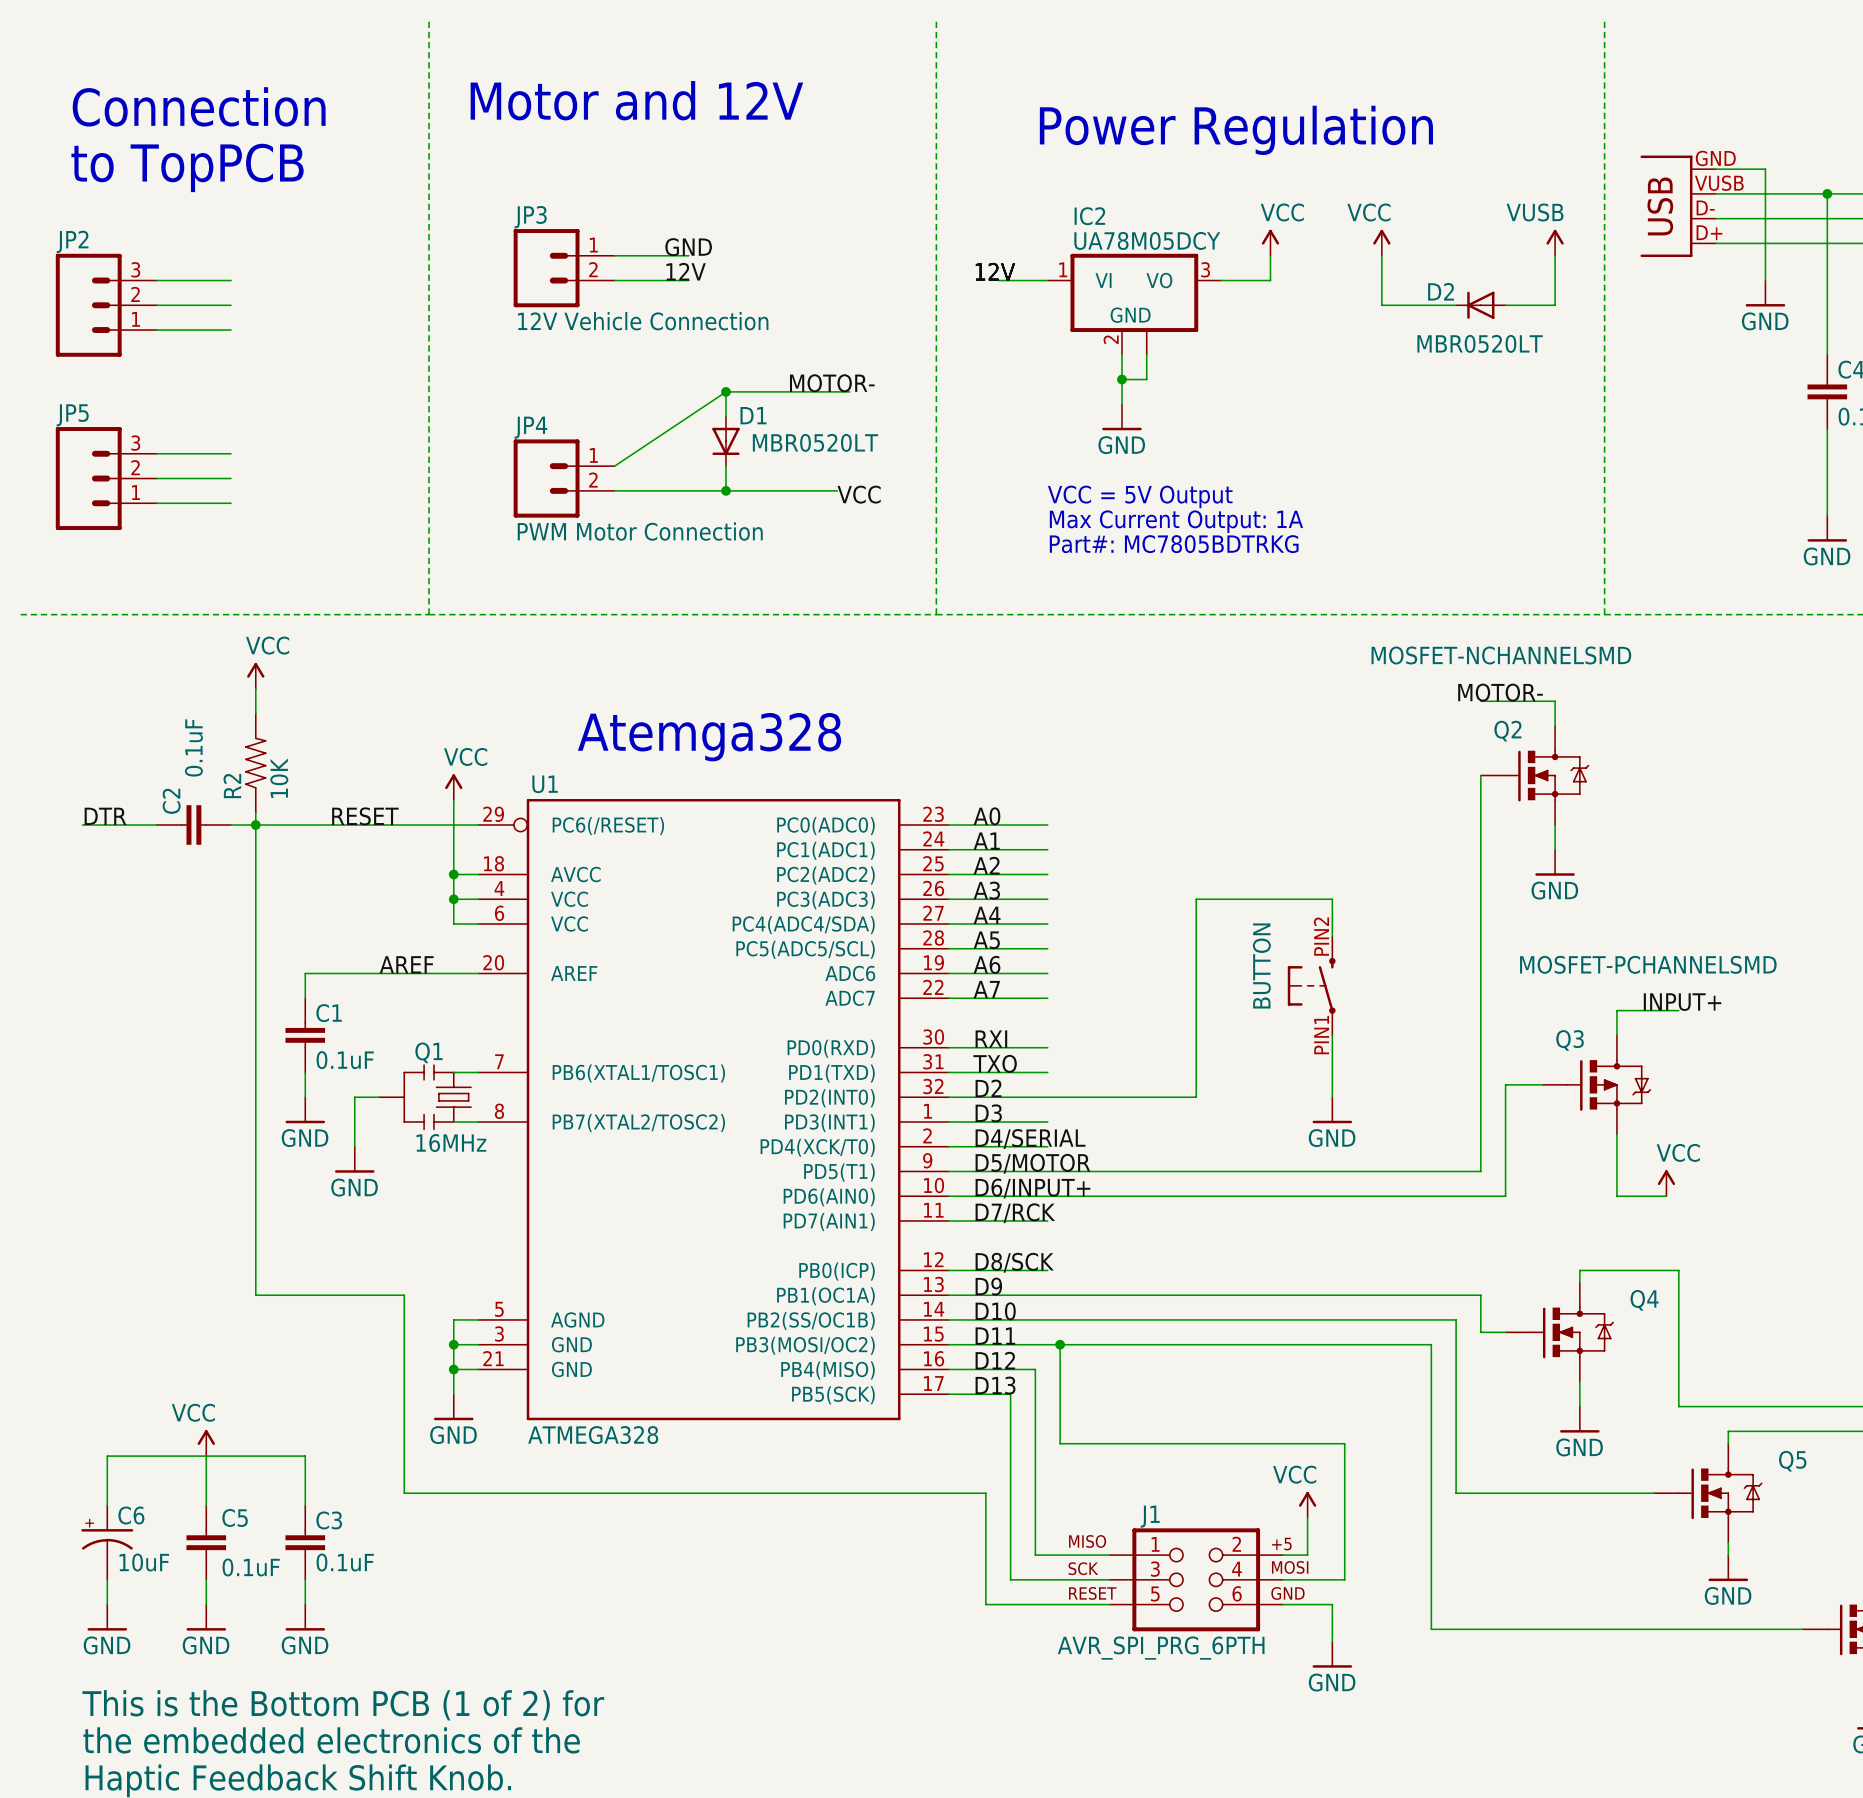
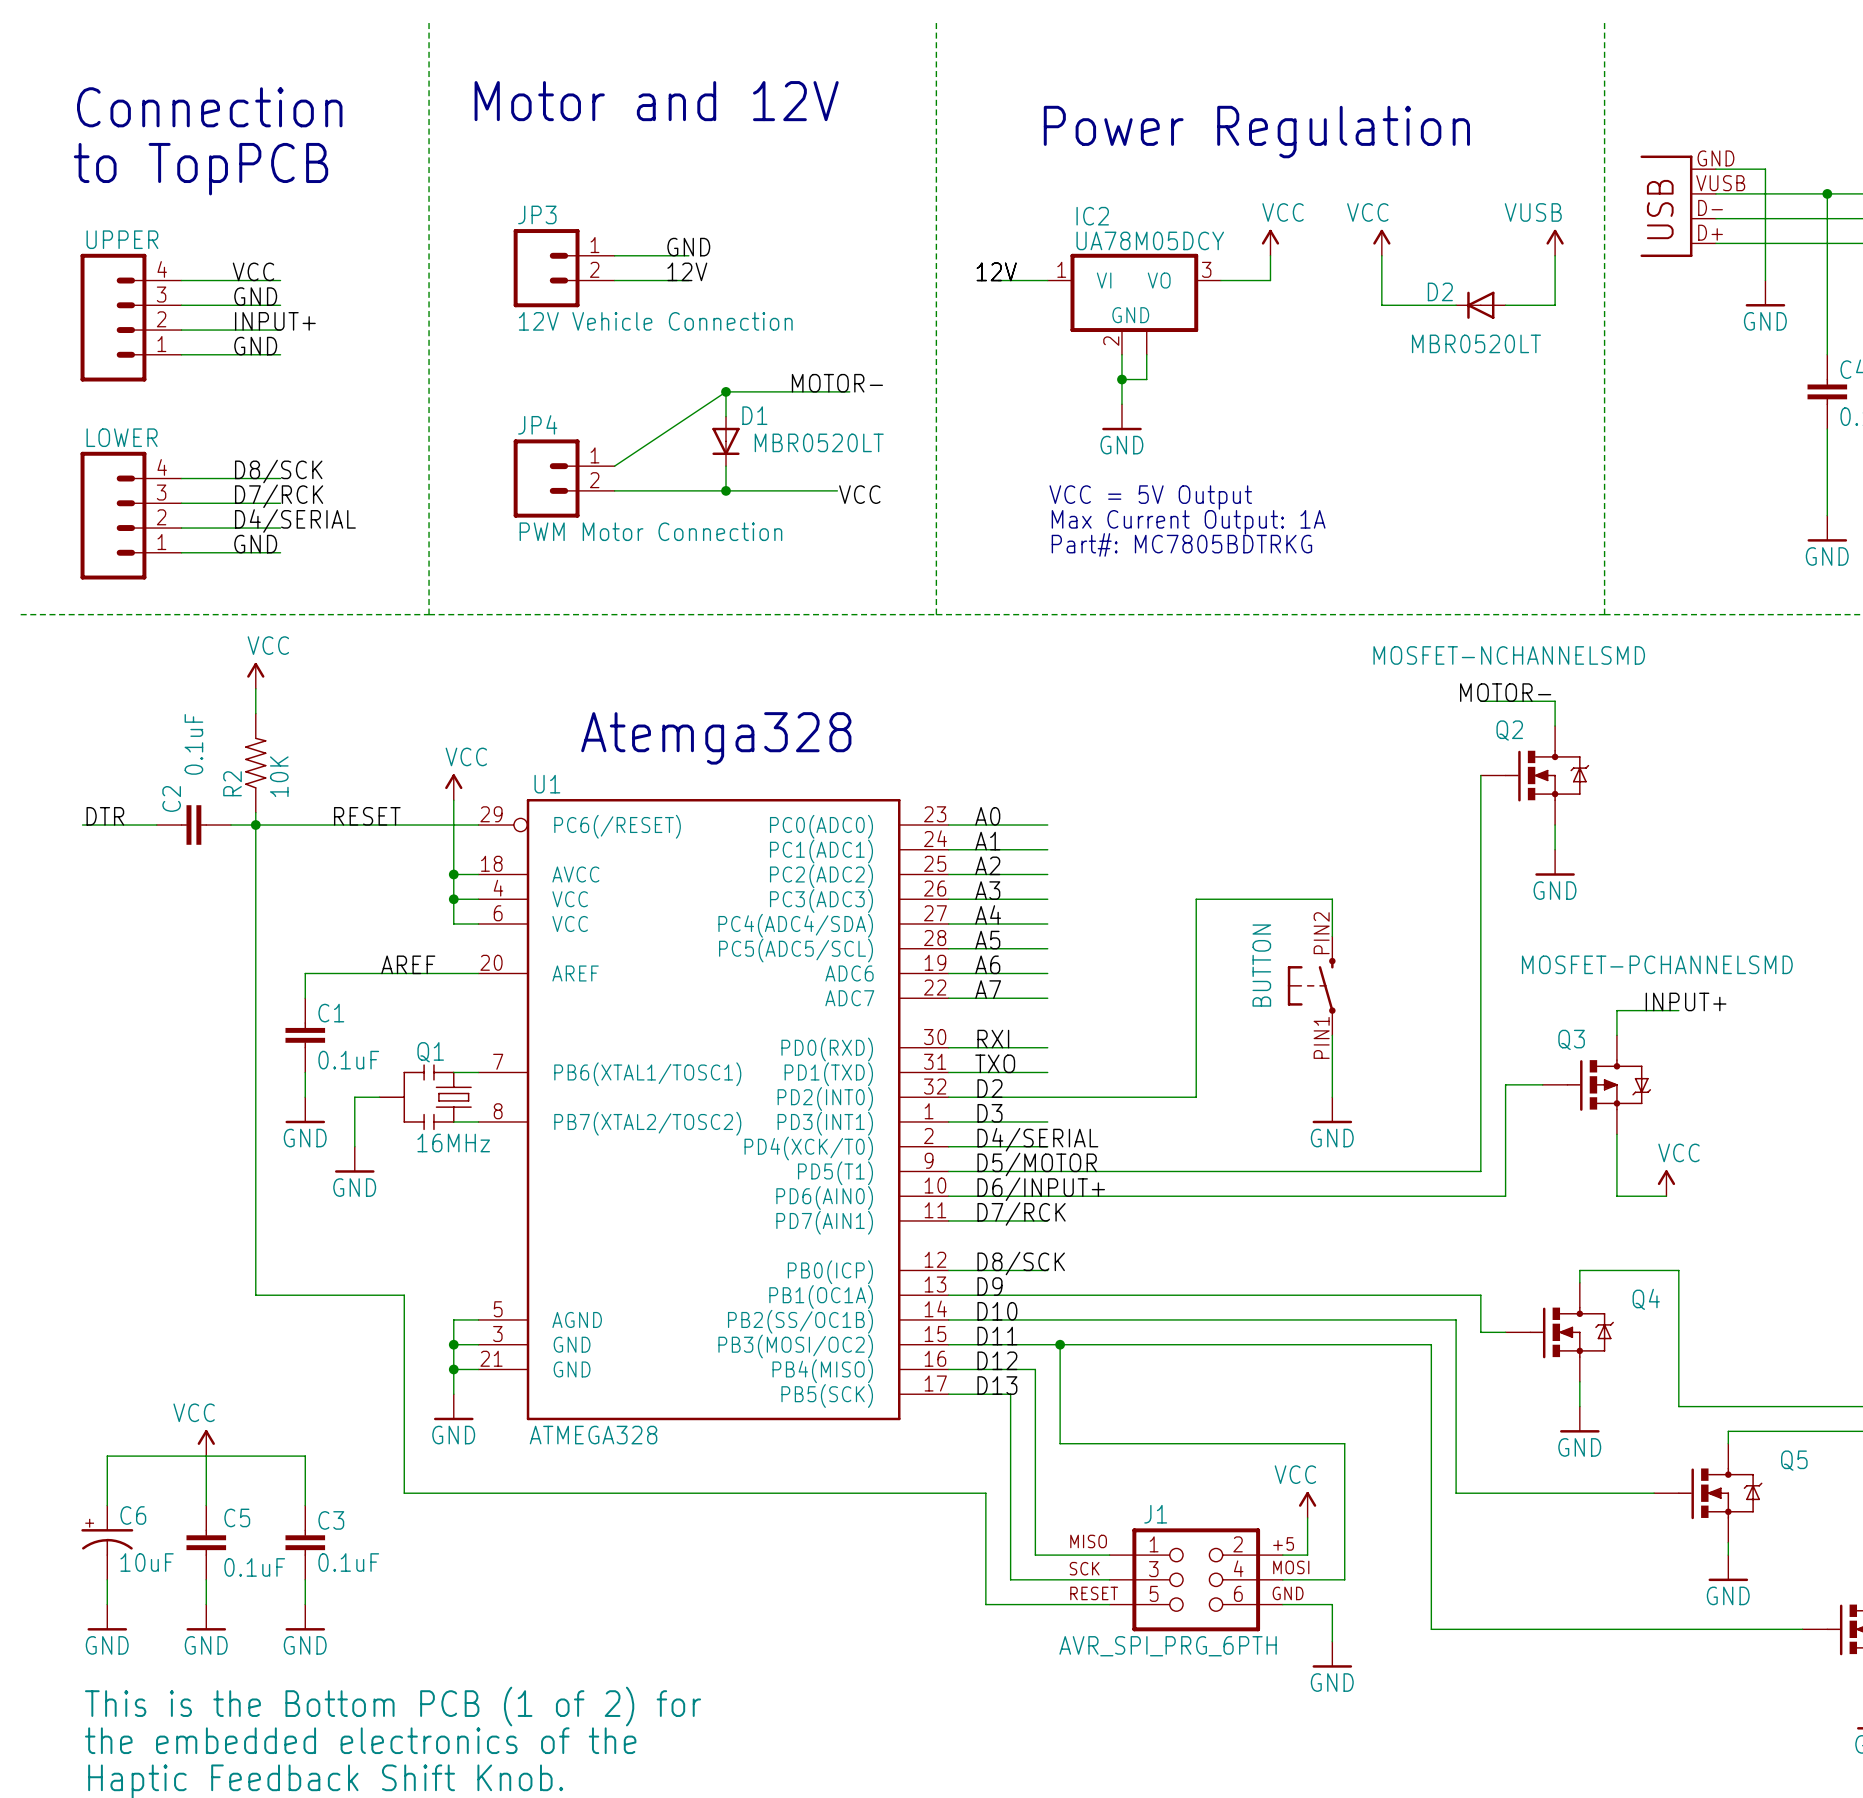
label: none -> VCC (253, 271)
wire: none -> (231, 280) (280, 280)
label: none -> GND (255, 296)
JP2: (106, 305) -> none
wire: none -> (231, 305) (280, 305)
UPPER: none -> (131, 317)
label: none -> INPUT+ (275, 321)
wire: none -> (231, 330) (280, 330)
label: none -> GND (255, 346)
wire: none -> (181, 354) (280, 354)
wire: (156, 453) (231, 453) -> none
label: none -> D8/SCK (278, 471)
JP5: (106, 478) -> none
wire: none -> (231, 478) (280, 478)
label: none -> D7/RCK (279, 496)
wire: none -> (231, 503) (280, 503)
LOWER: none -> (131, 515)
label: none -> D4/SERIAL (295, 521)
wire: none -> (181, 528) (280, 528)
label: none -> GND (255, 544)
wire: none -> (181, 552) (280, 552)

